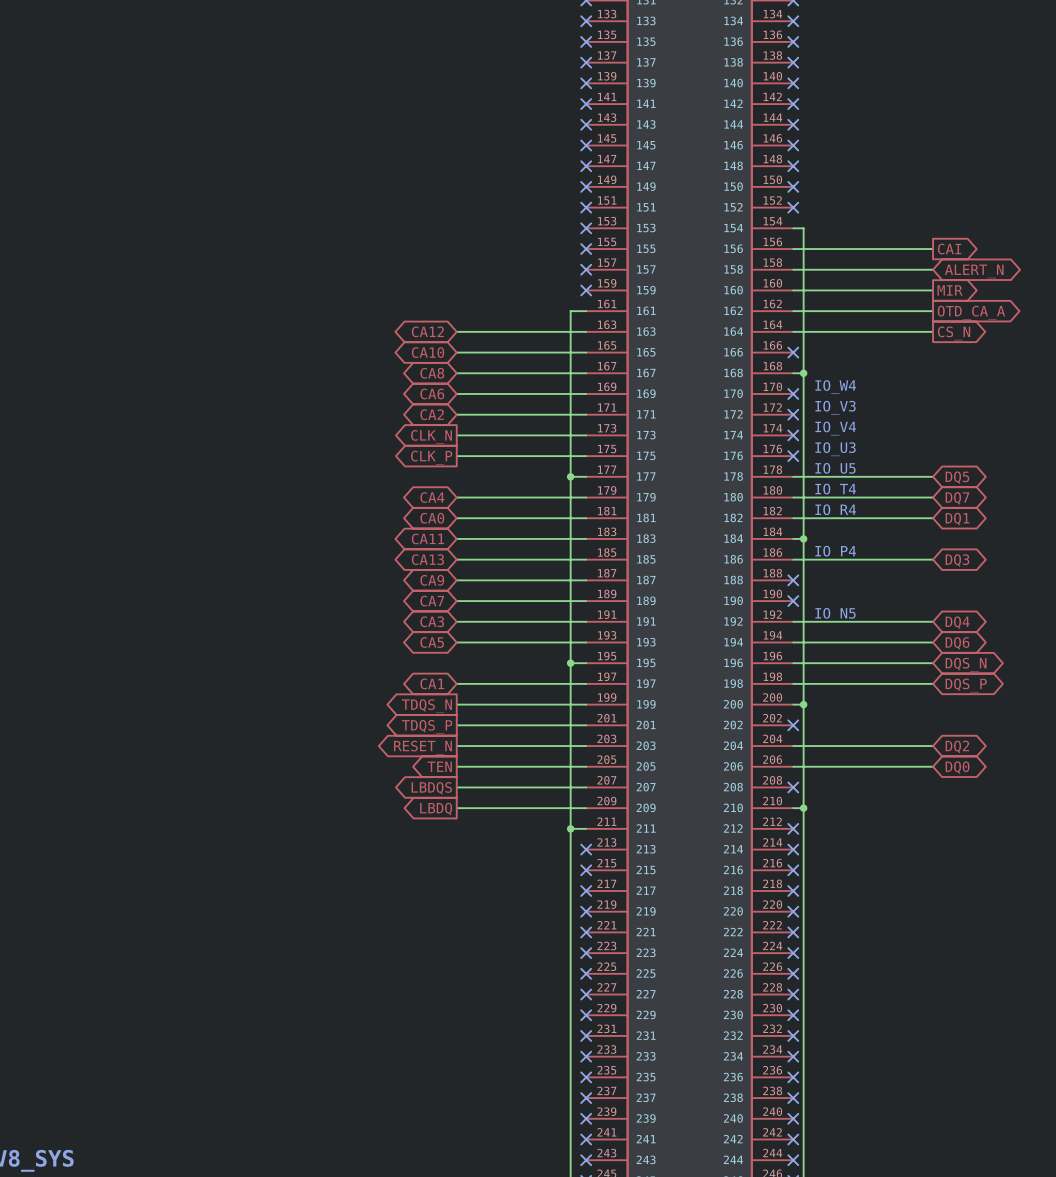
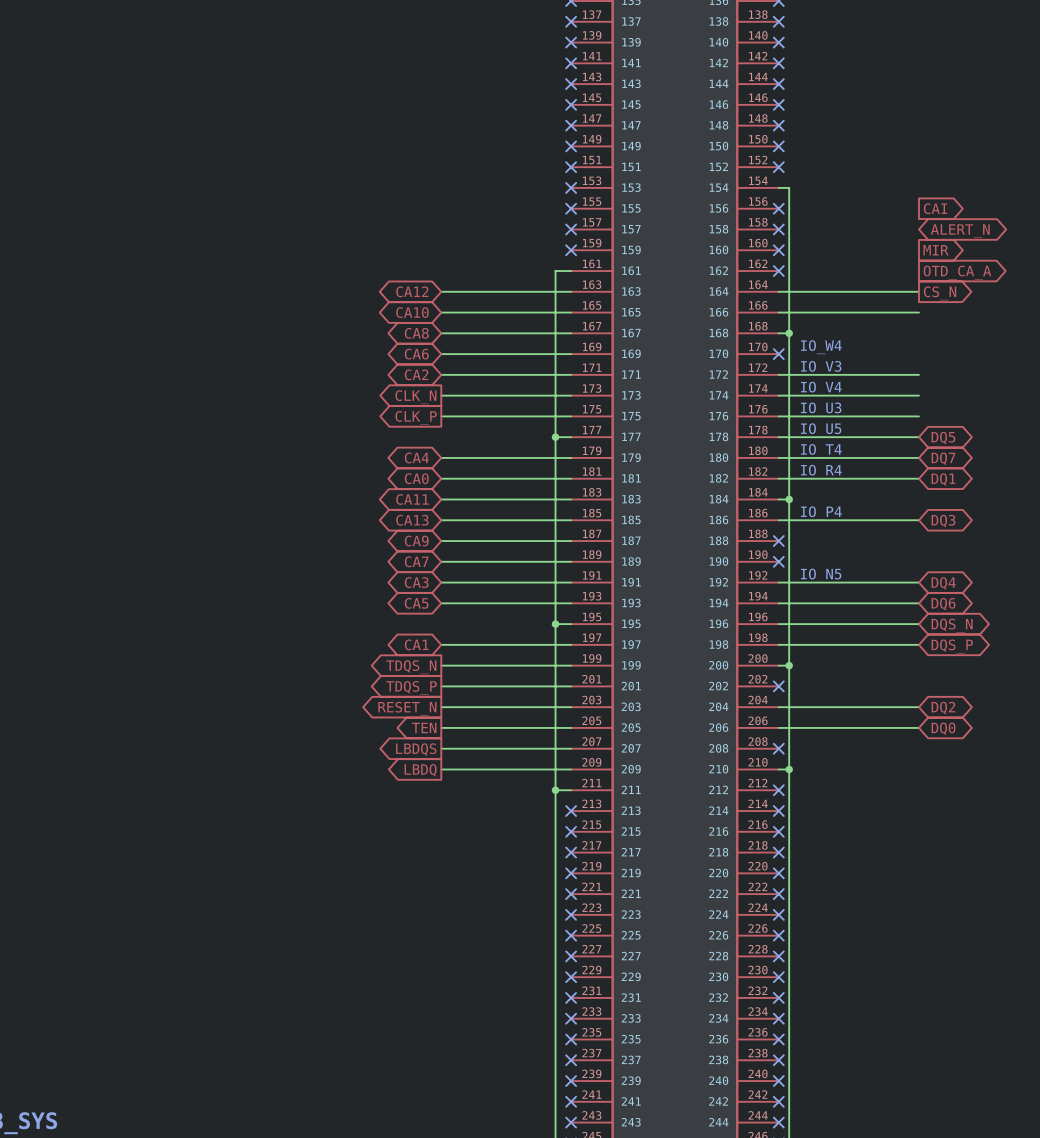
wire: (793, 249) (933, 249) -> (778, 312) (918, 312)
no-connect mark: none -> (778, 208)
wire: (793, 269) (933, 269) -> (778, 374) (918, 374)
no-connect mark: none -> (778, 229)
wire: (793, 290) (933, 290) -> (778, 395) (918, 395)
no-connect mark: none -> (778, 250)
wire: (793, 311) (933, 311) -> (778, 416) (918, 416)
no-connect mark: none -> (778, 271)
no-connect mark: (793, 352) -> none
no-connect mark: (793, 414) -> none
no-connect mark: (793, 435) -> none
no-connect mark: (793, 456) -> none

